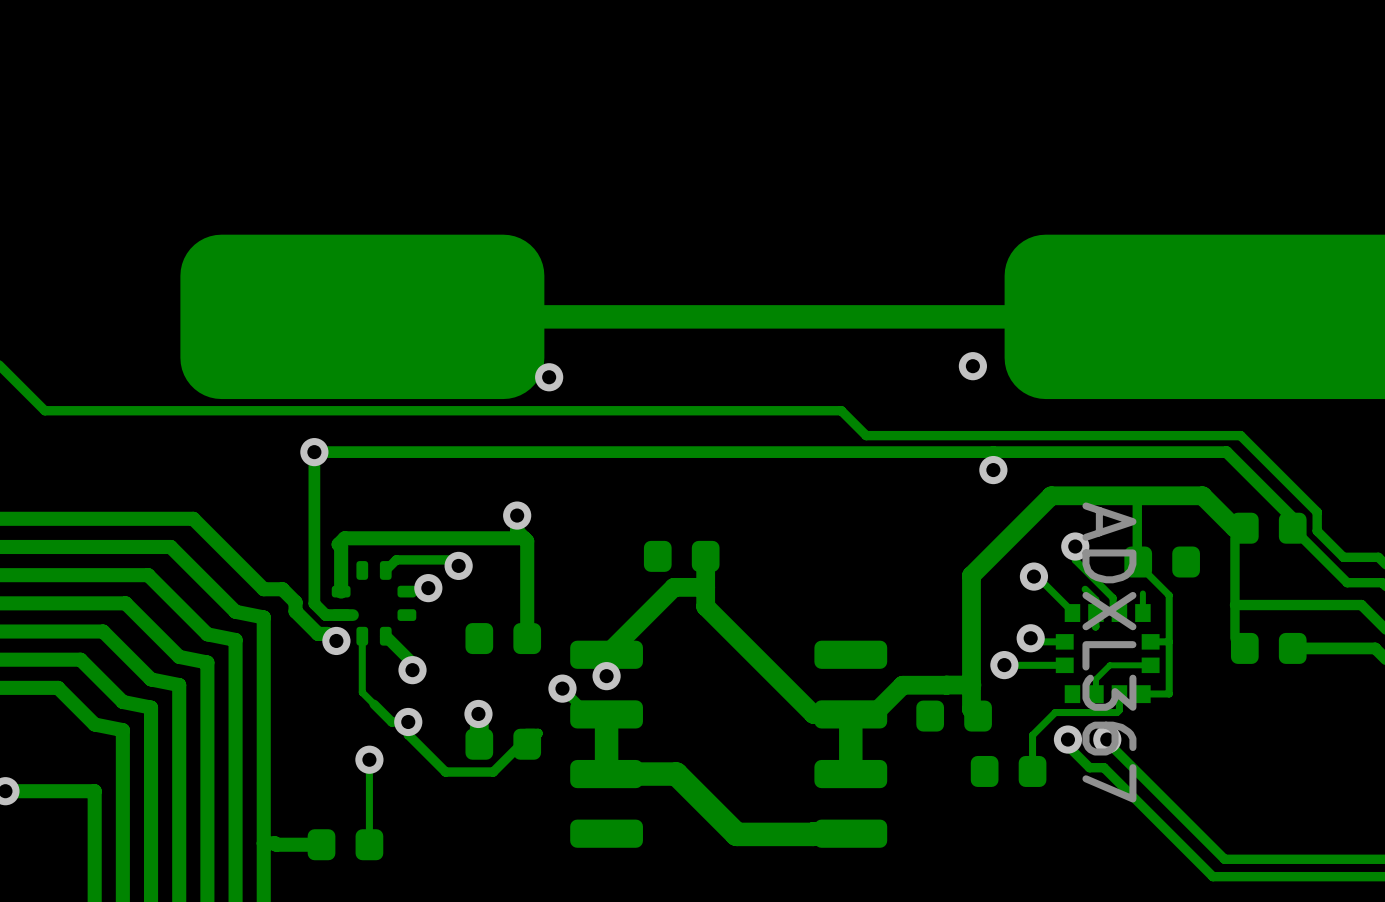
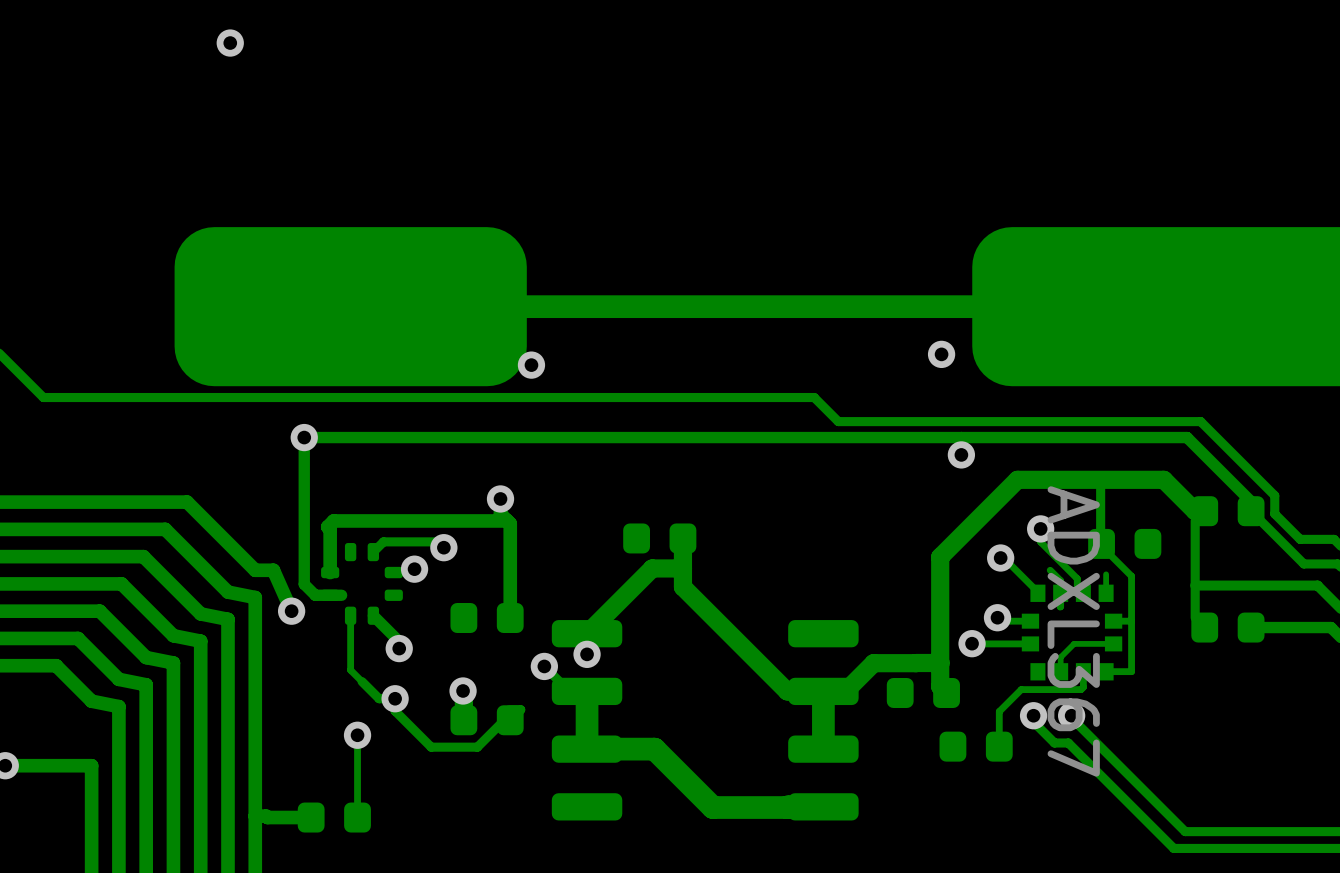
via: none -> (230, 43)
track: (282, 589) (295, 602) (295, 611) (317, 633) (327, 633) (336, 640) -> (273, 570) (291, 611)
via position: (336, 640) -> (291, 611)

